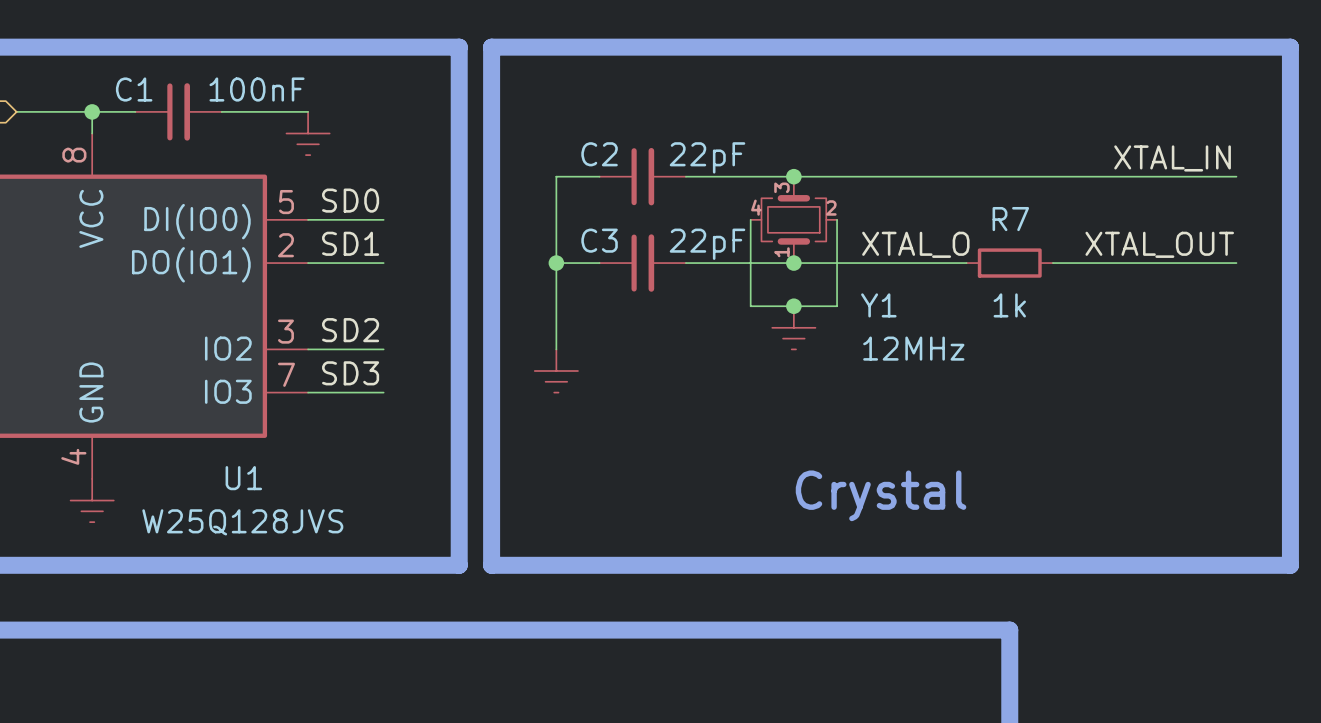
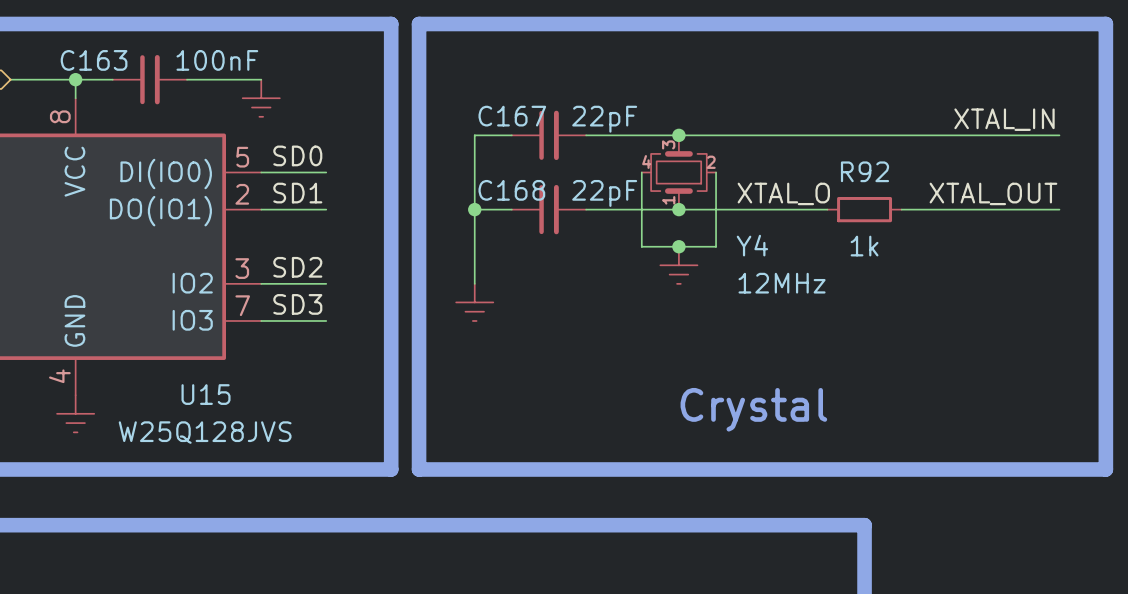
C1 name: C1 (134, 89) -> C163 (94, 60)
C2 name: C2 (599, 154) -> C167 (512, 116)
R7 name: R7 (1010, 219) -> R92 (864, 171)
C3 name: C3 (599, 240) -> C168 (511, 190)
Y1 name: Y1 (878, 305) -> Y4 (752, 245)
U1 name: U1 (243, 478) -> U15 (206, 394)

